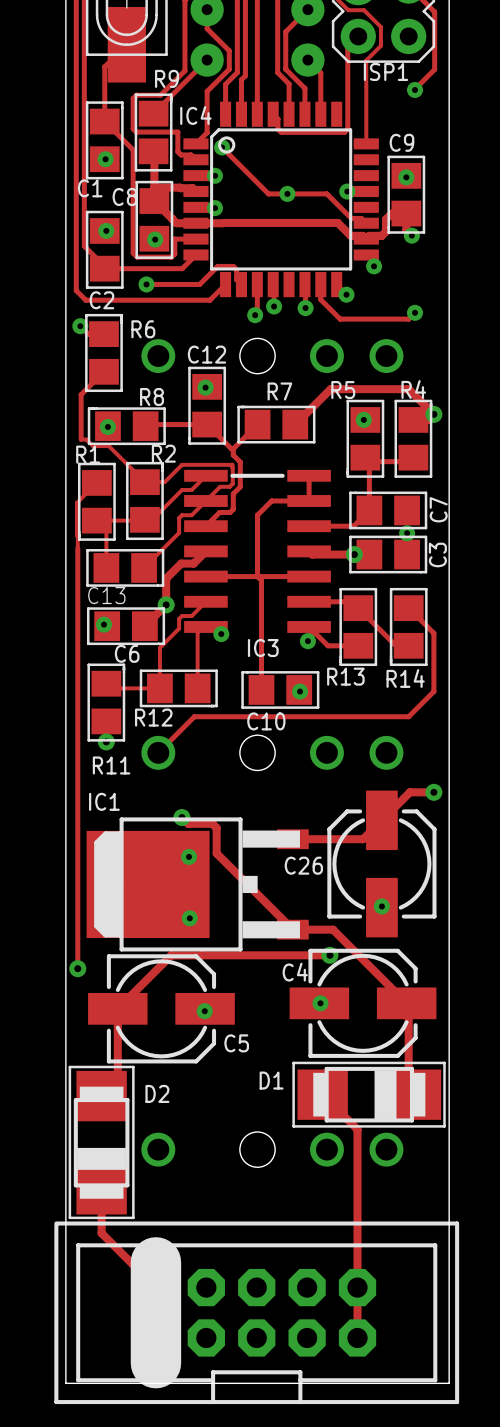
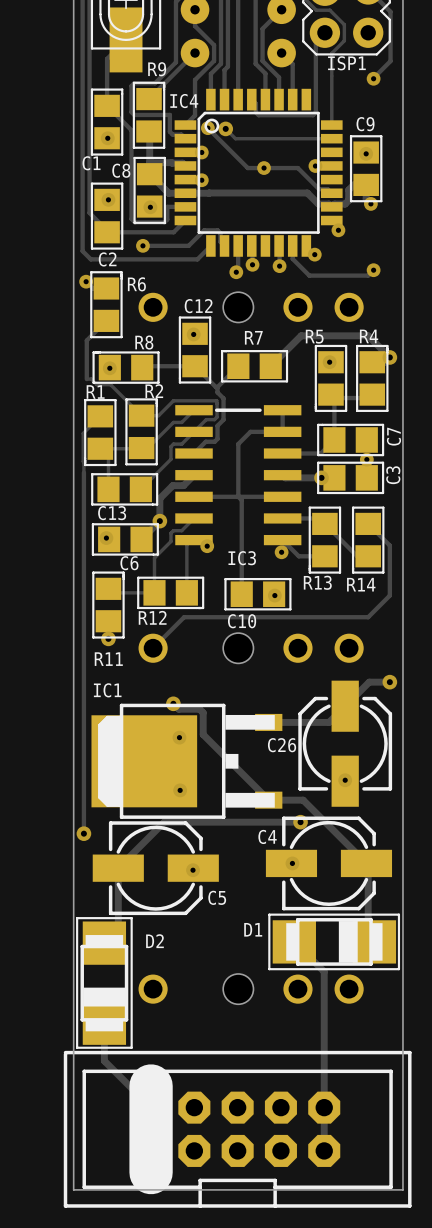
track: none -> (225, 128) (235, 138) (331, 138)
via: none -> (225, 128)

